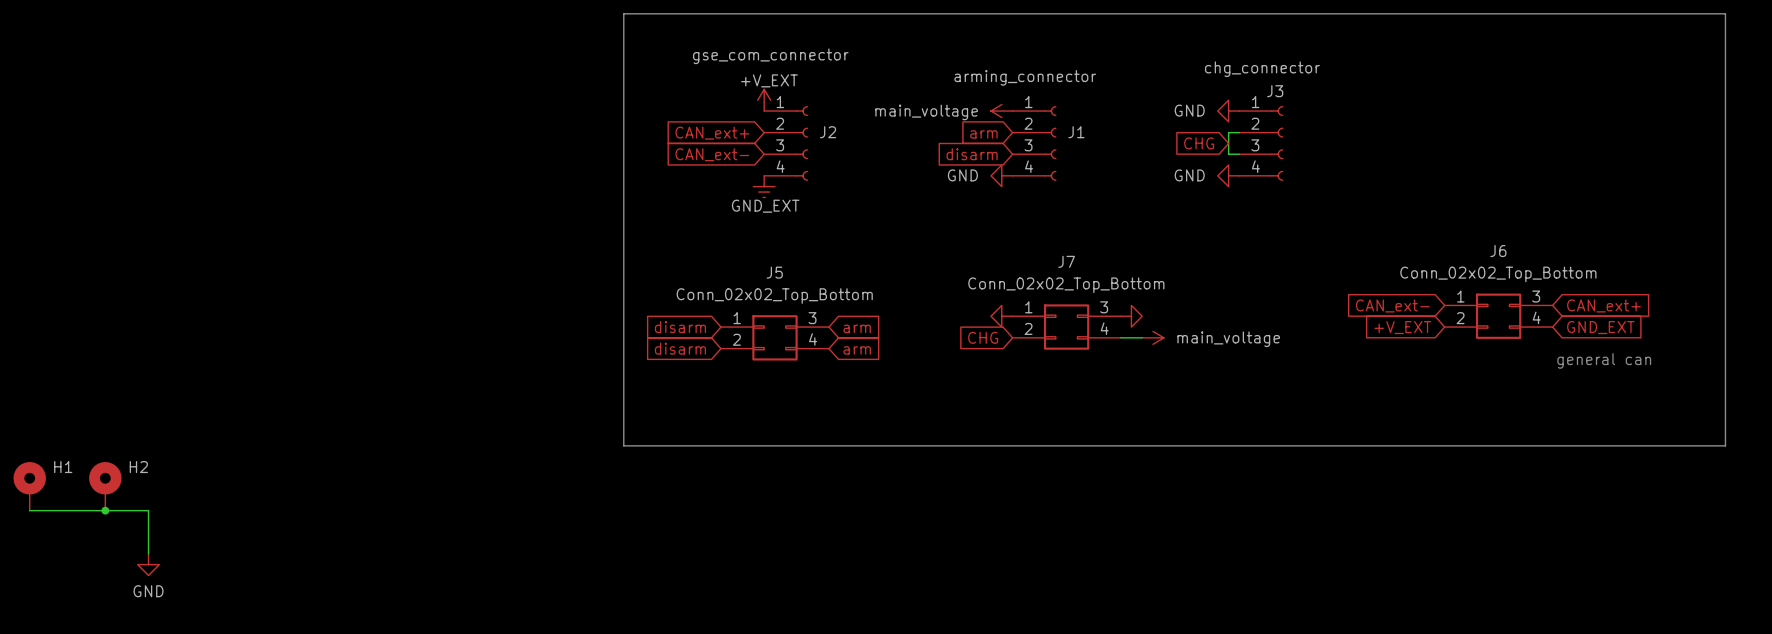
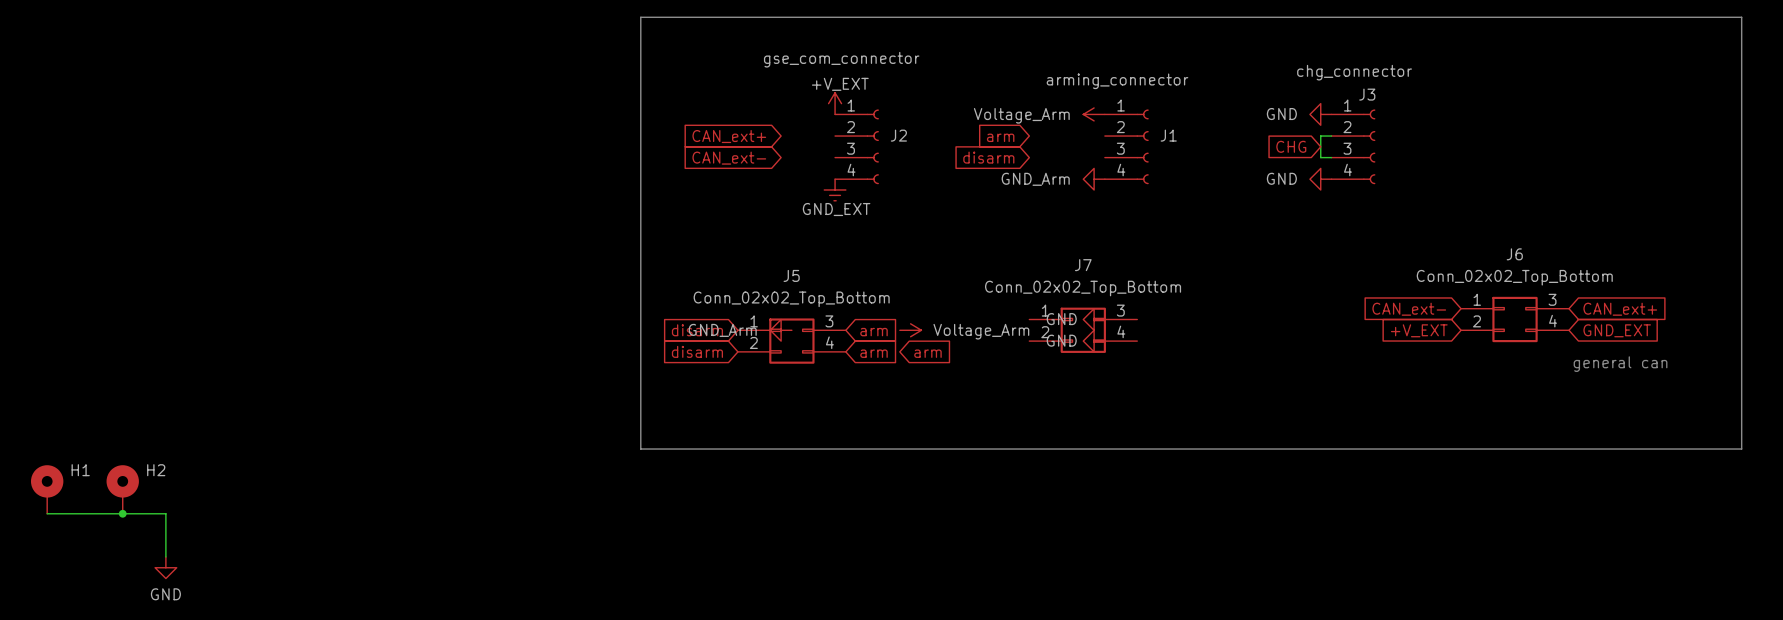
power symbol position: +V_EXT (764, 100) -> +V_EXT (835, 103)
power symbol: main_voltage (1001, 111) -> none
power symbol: none -> Voltage_Arm (1094, 114)
power symbol: GND (1228, 111) -> none
power symbol: none -> GND (1320, 114)
wire: (1239, 132) (1228, 132) (1228, 154) (1239, 154) -> (1331, 136) (1320, 136) (1320, 157) (1331, 157)
J2 position: (786, 143) -> (856, 146)
J1 position: (1034, 143) -> (1126, 146)
global label position: CHG (1199, 143) -> CHG (1291, 146)
J3 position: (1261, 143) -> (1353, 146)
power symbol: GND (1001, 175) -> none
power symbol: none -> GND_Arm (1094, 179)
power symbol: GND (1228, 175) -> none
power symbol: none -> GND (1320, 179)
power symbol position: GND_EXT (764, 186) -> GND_EXT (835, 189)
power symbol: (1001, 316) -> none
power symbol: none -> GND (1094, 319)
power symbol: (1131, 316) -> none
power symbol: none -> GND_Arm (781, 330)
power symbol: none -> Voltage_Arm (910, 330)
global label: CHG (983, 337) -> none
power symbol: none -> GND (1094, 341)
wire: (1120, 337) (1142, 337) -> none
power symbol: main_voltage (1153, 337) -> none
global label: none -> arm (927, 353)

